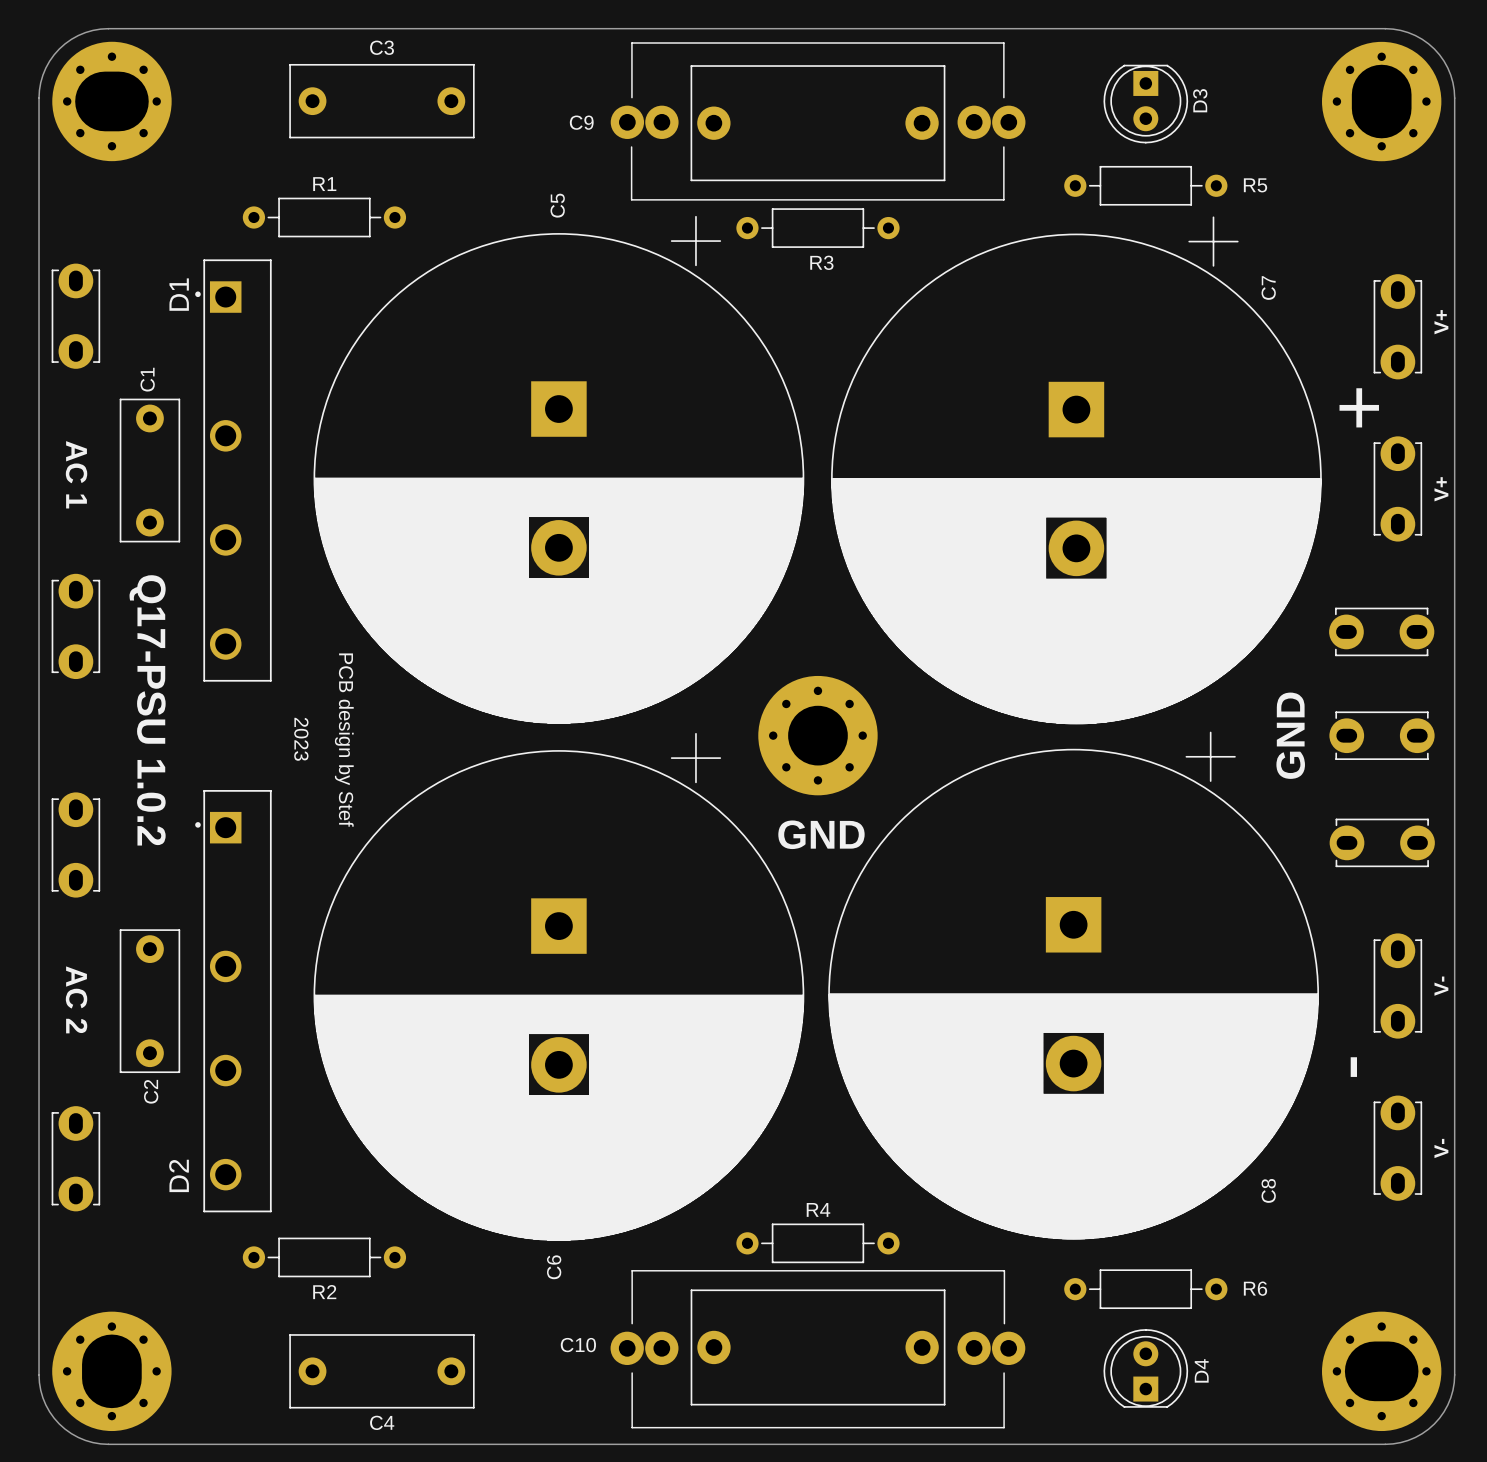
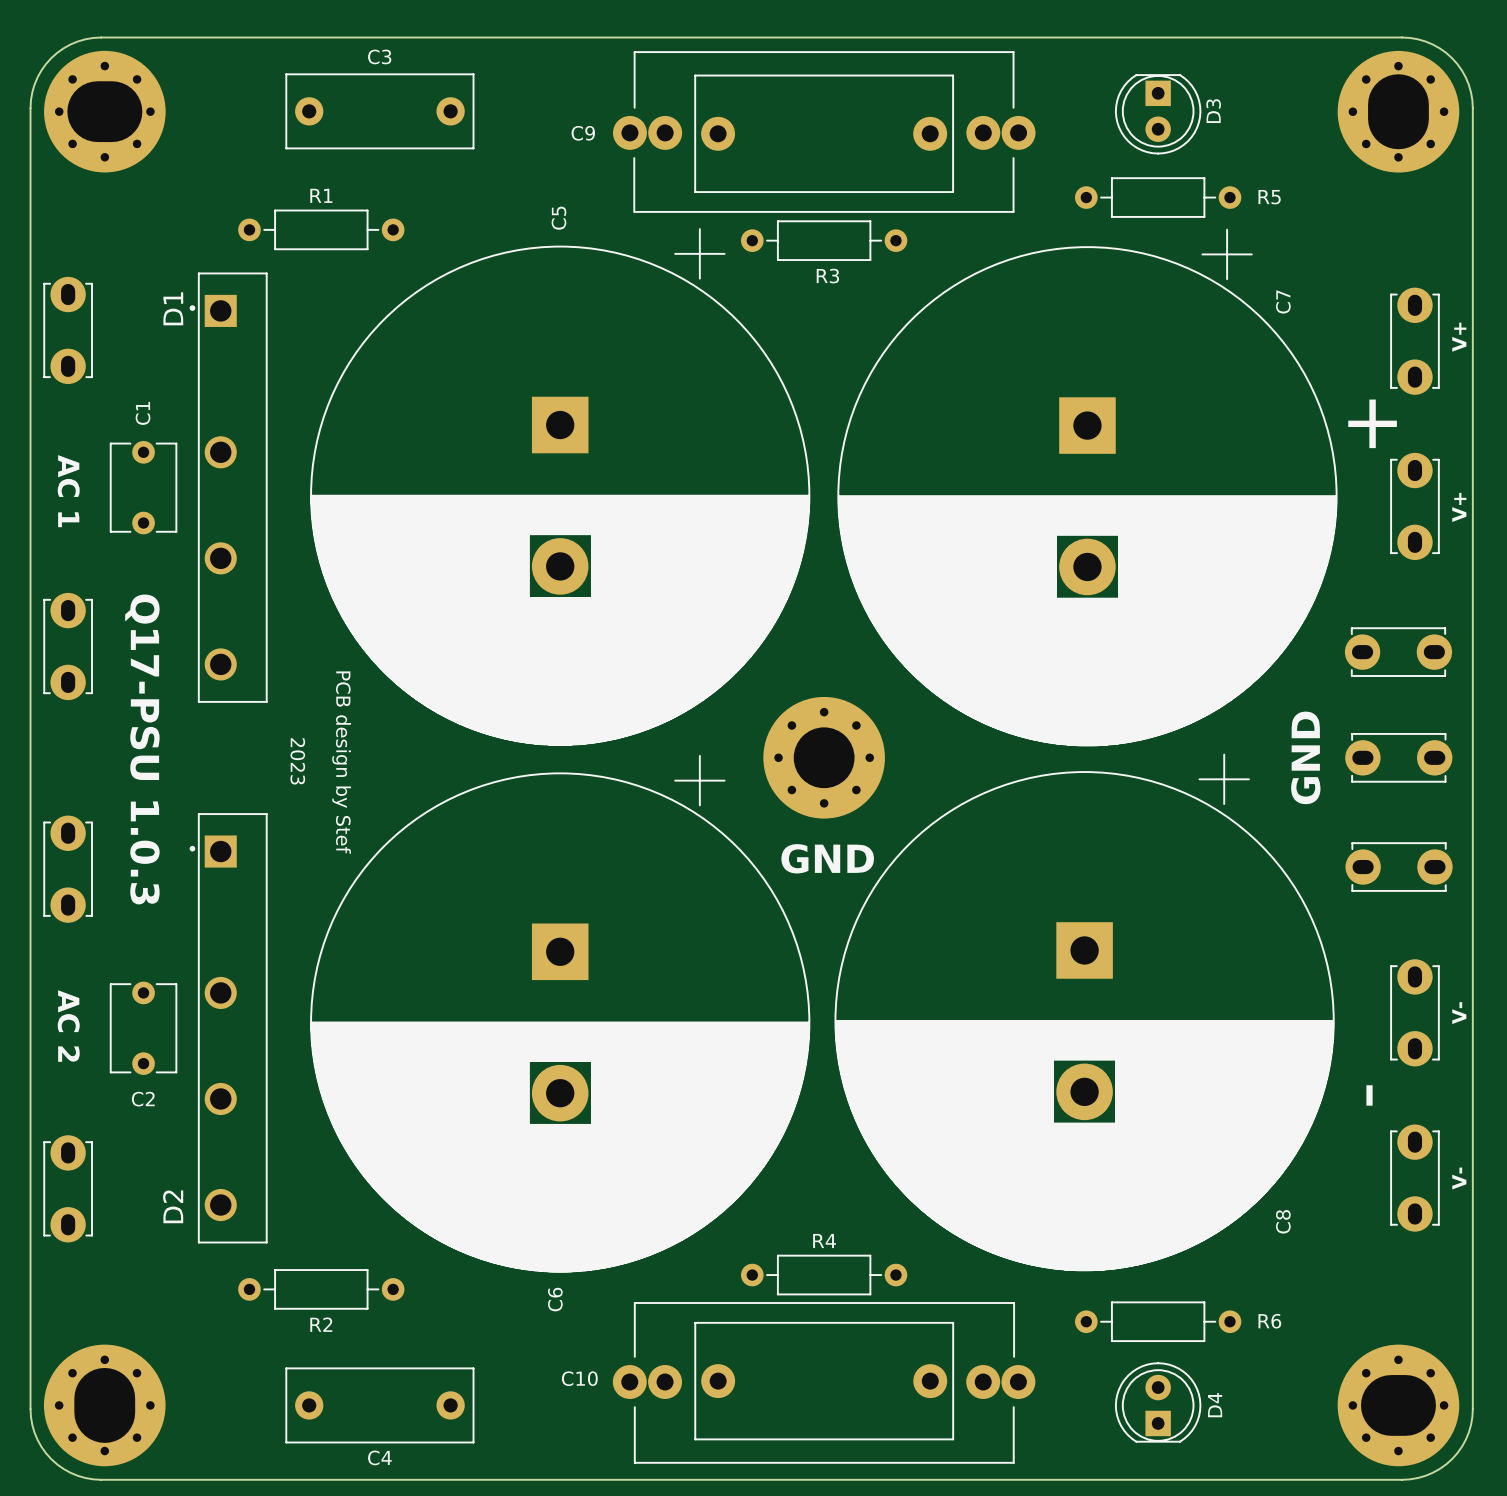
C1 footprint: [119, 398, 181, 543] -> [109, 441, 178, 535]
text: Q17-PSU 1.0.2 (147, 710) -> Q17-PSU 1.0.3 (142, 749)
C2 footprint: [119, 929, 181, 1074] -> [109, 981, 178, 1075]

